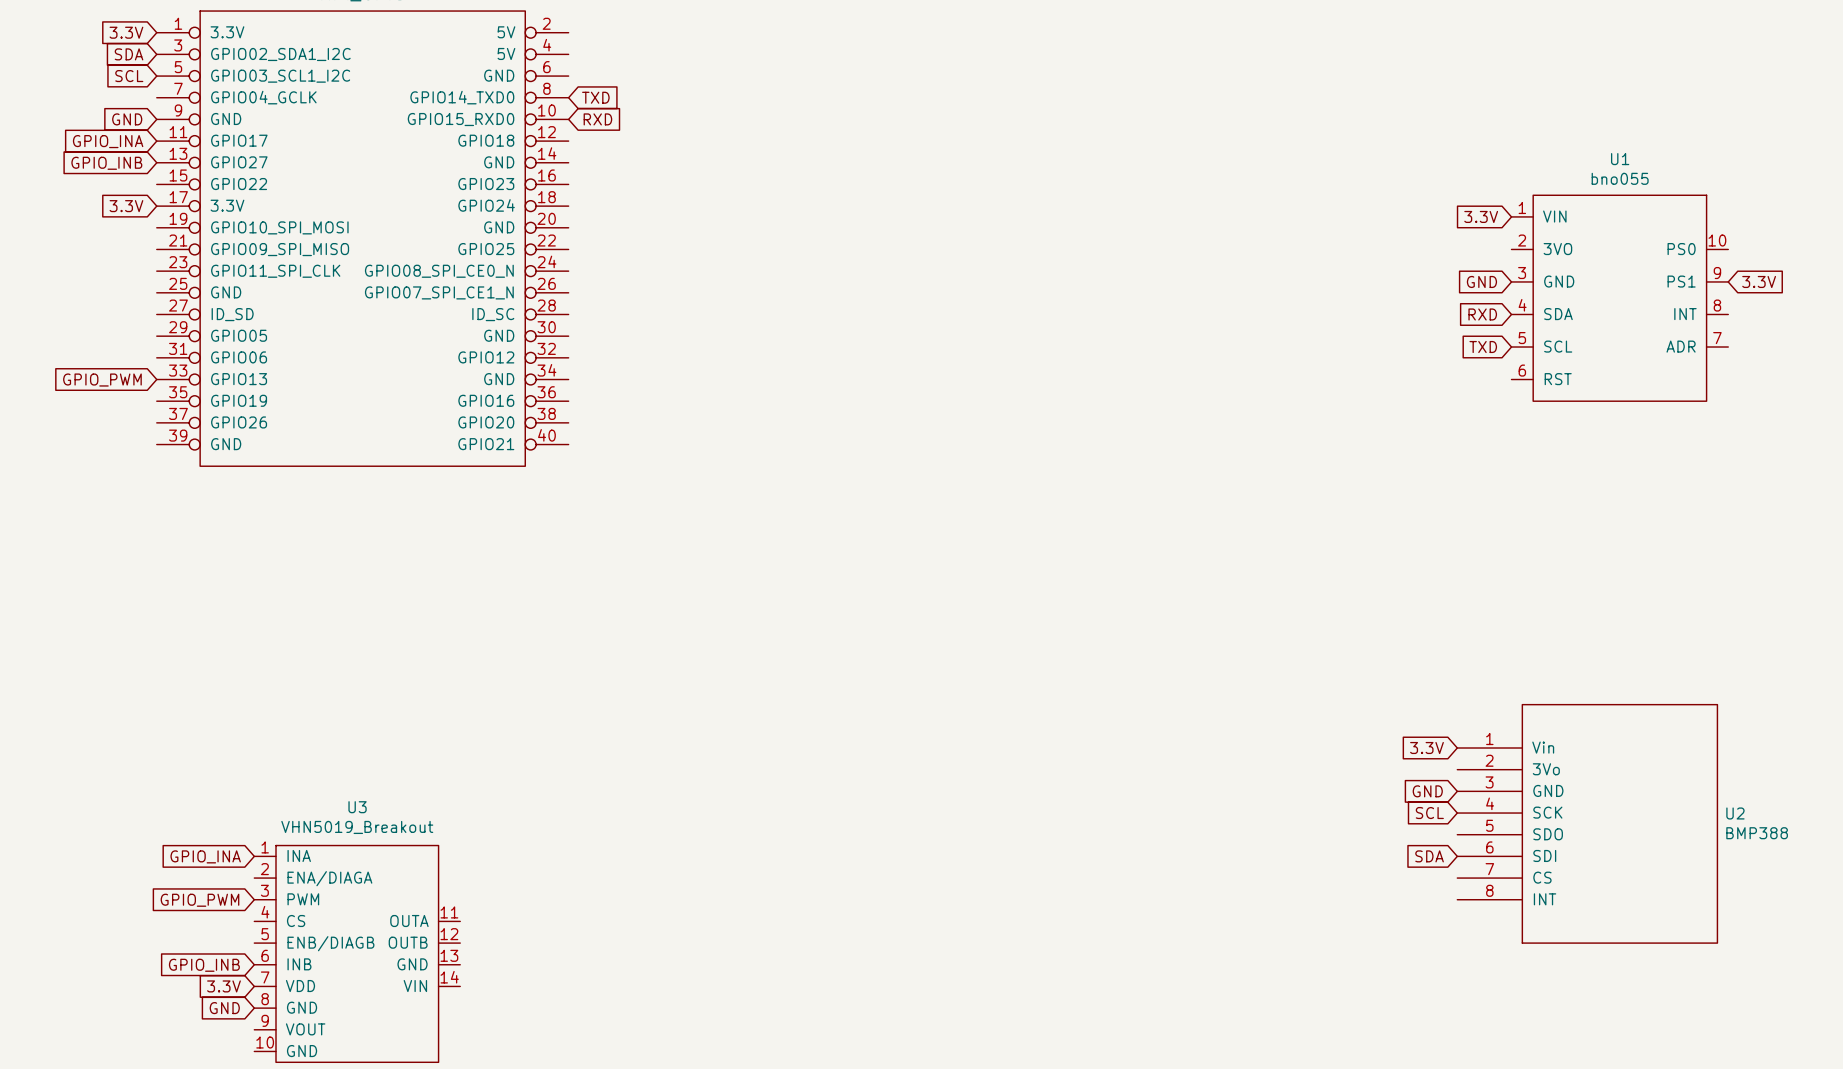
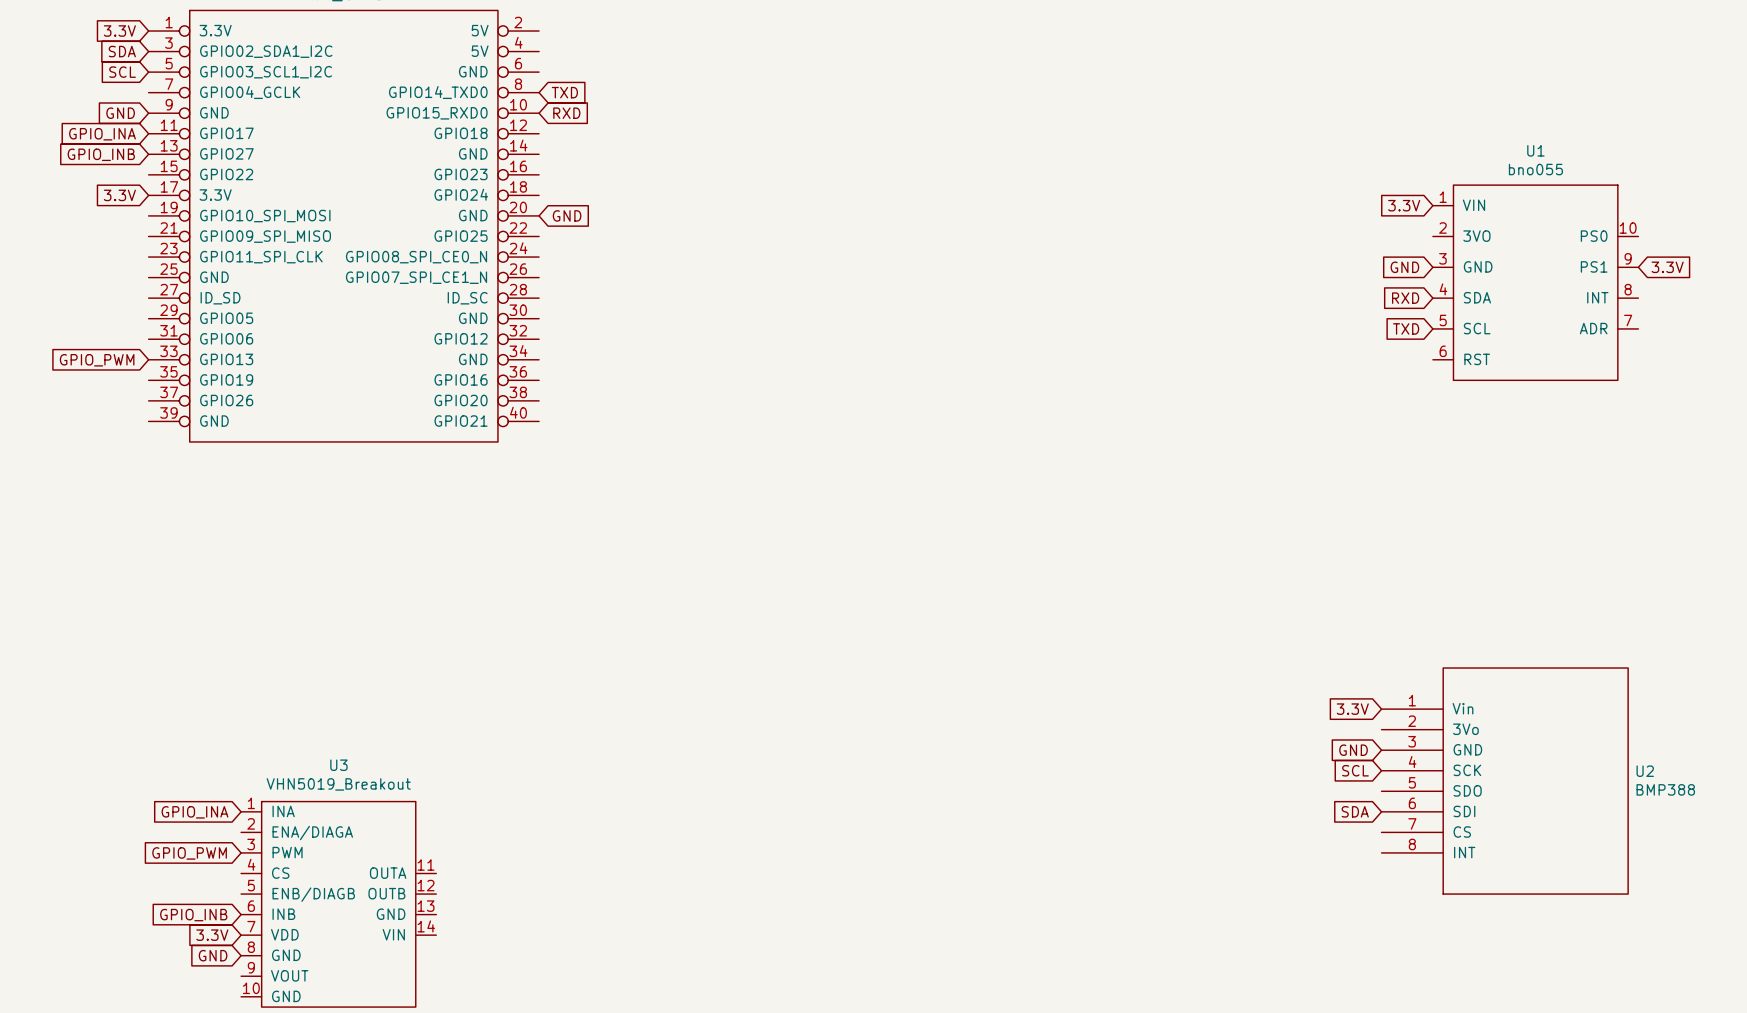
global label: none -> GND (567, 215)

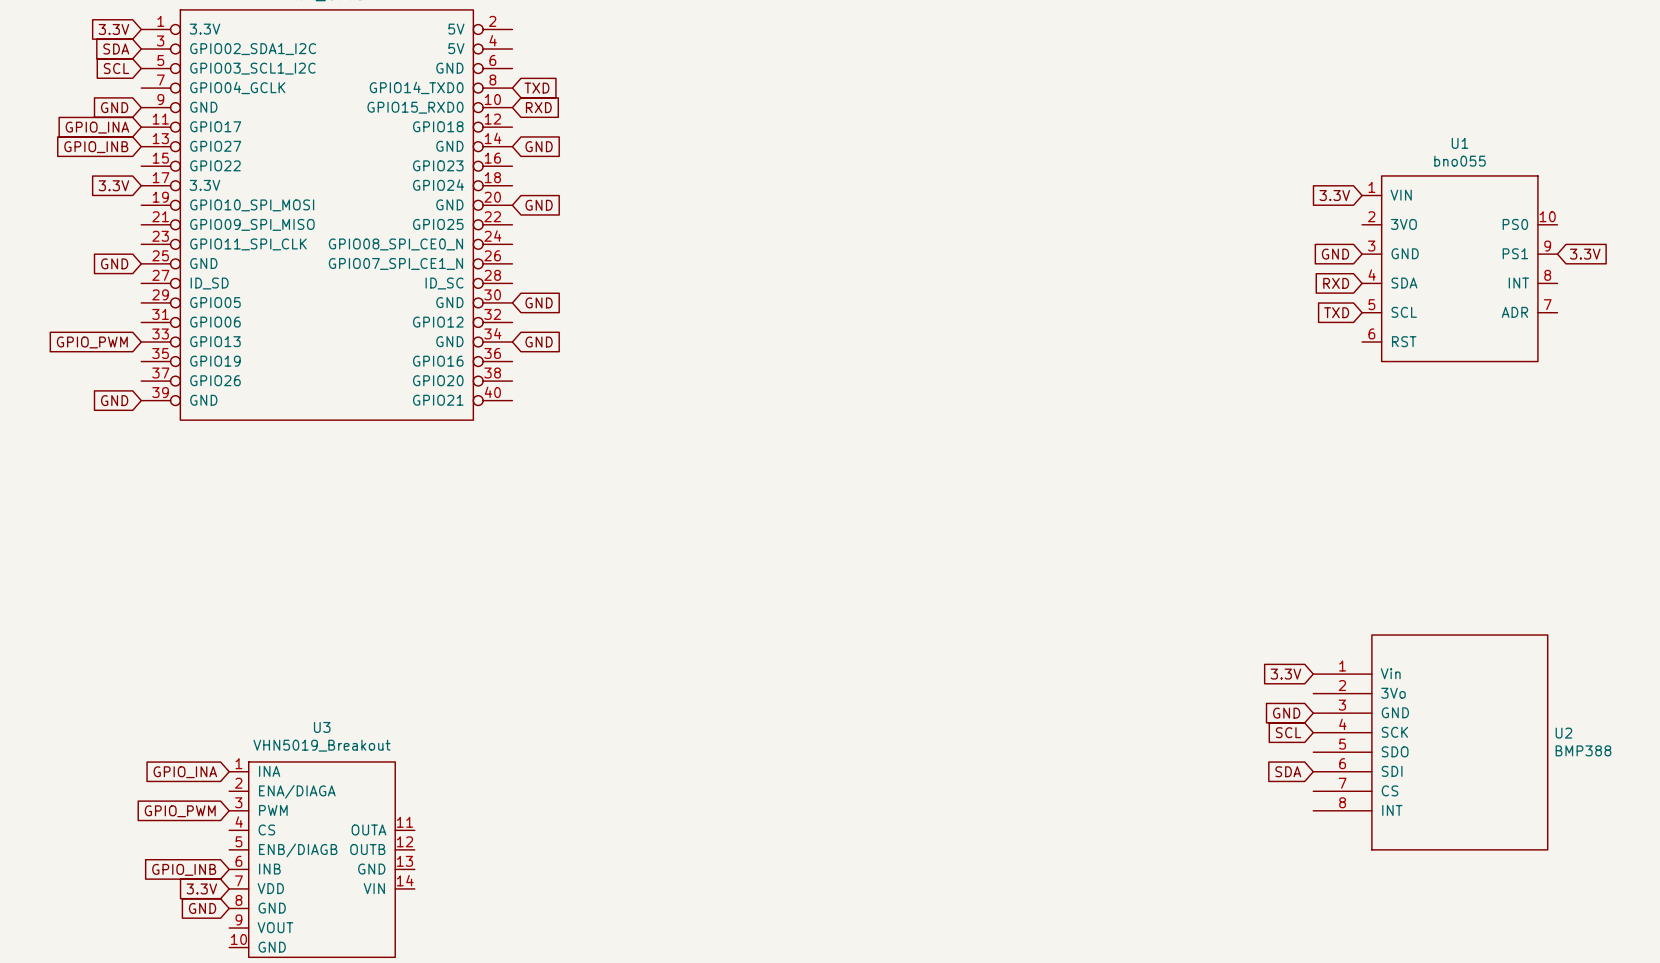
global label: none -> GND (539, 146)
global label: none -> GND (114, 263)
global label: none -> GND (539, 302)
global label: none -> GND (539, 342)
global label: none -> GND (114, 400)

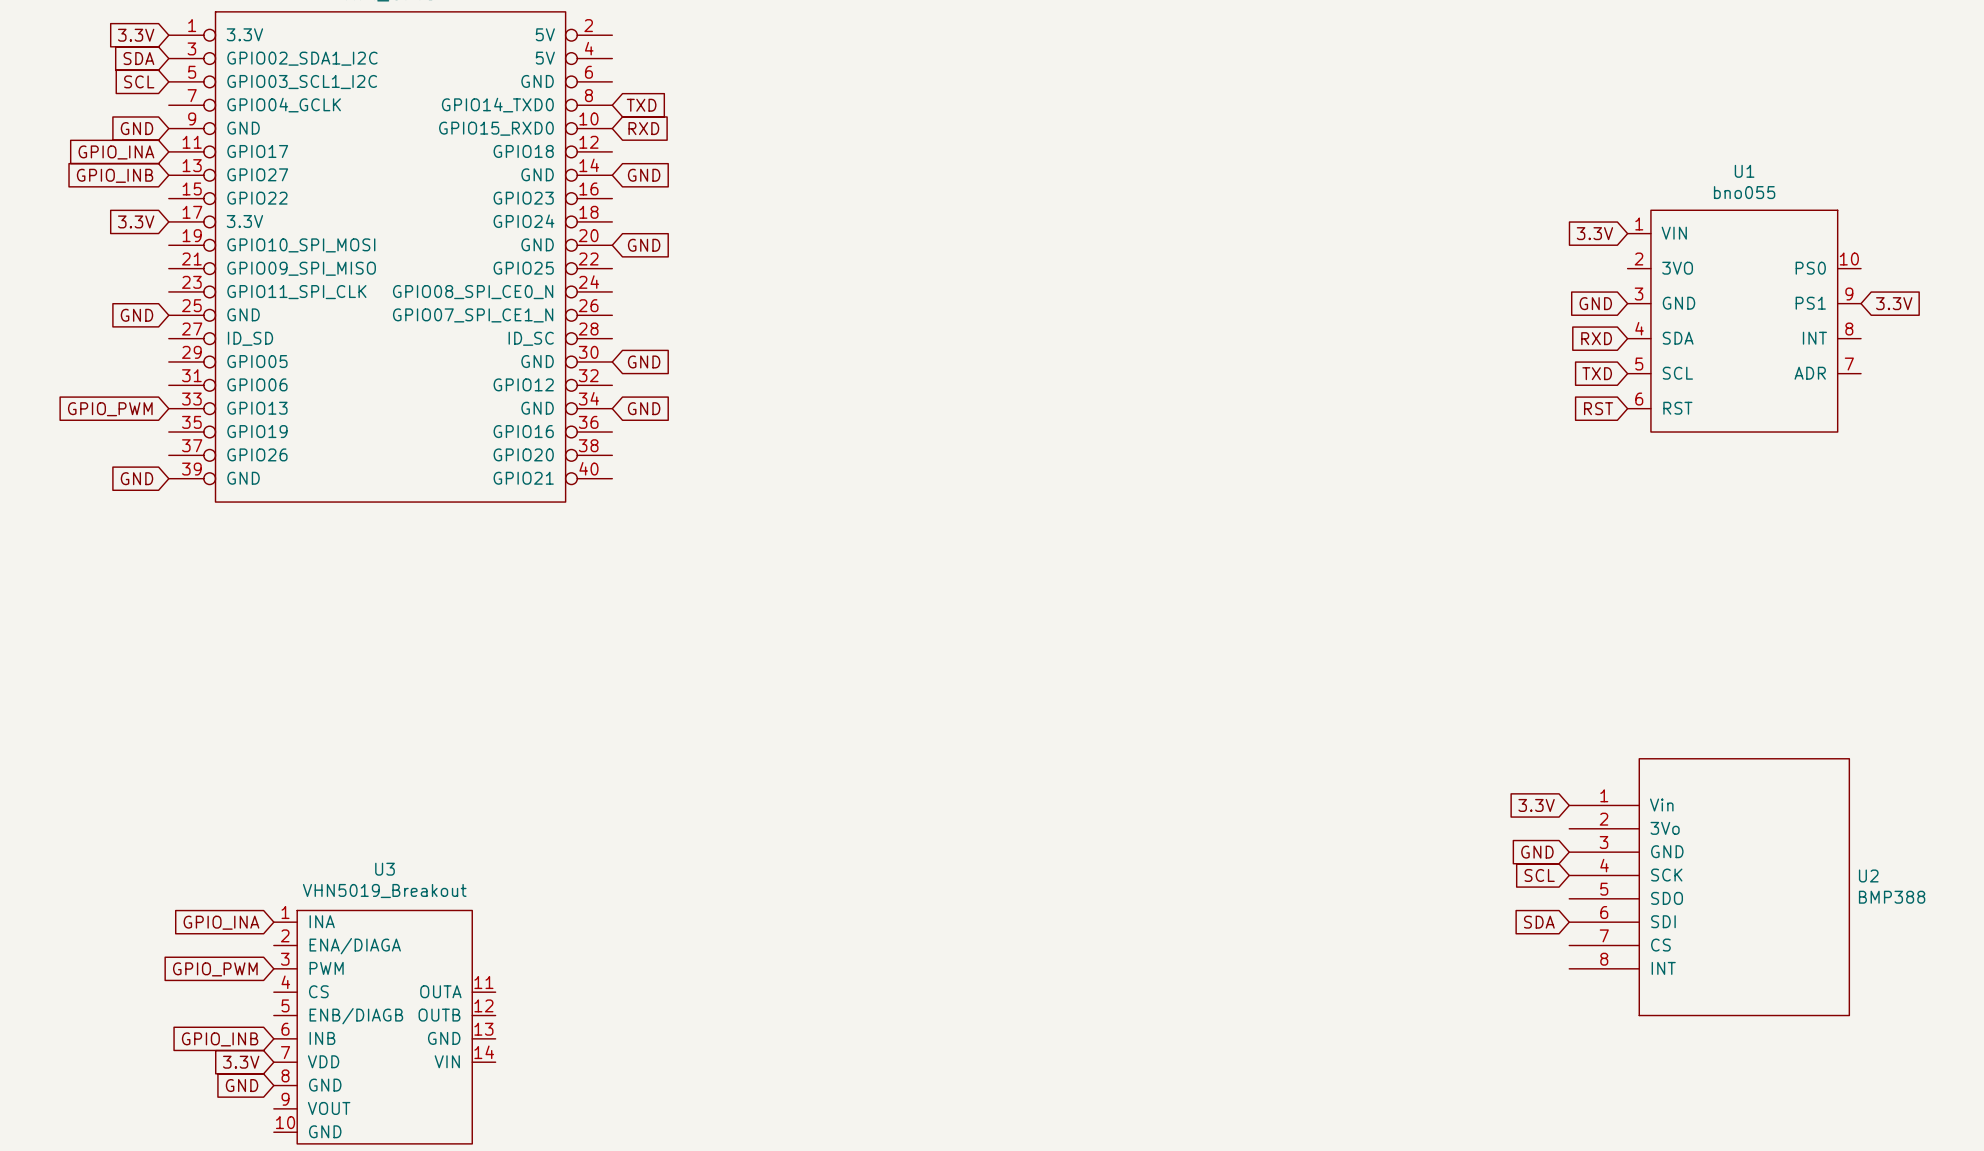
global label: none -> RST (1598, 408)

